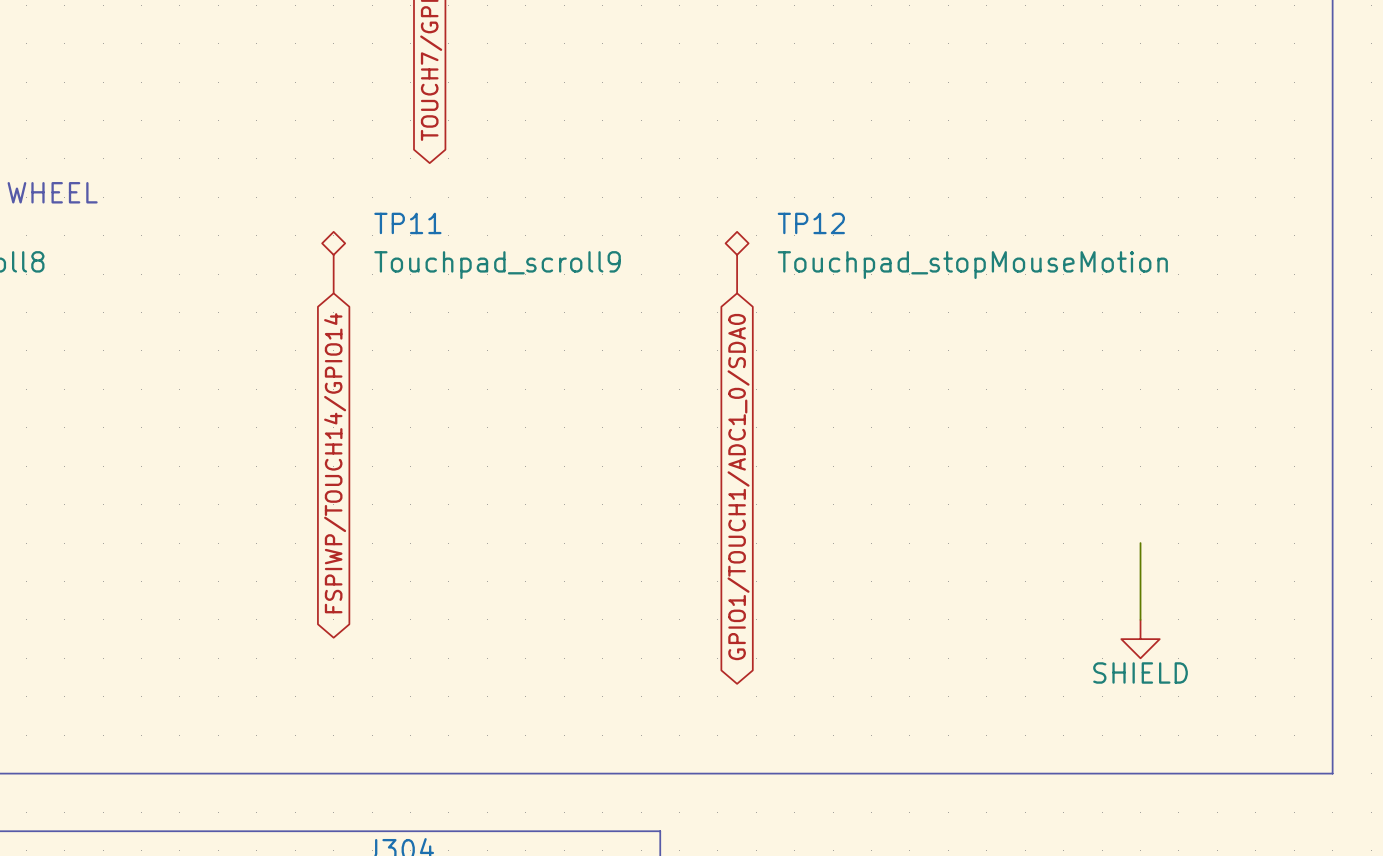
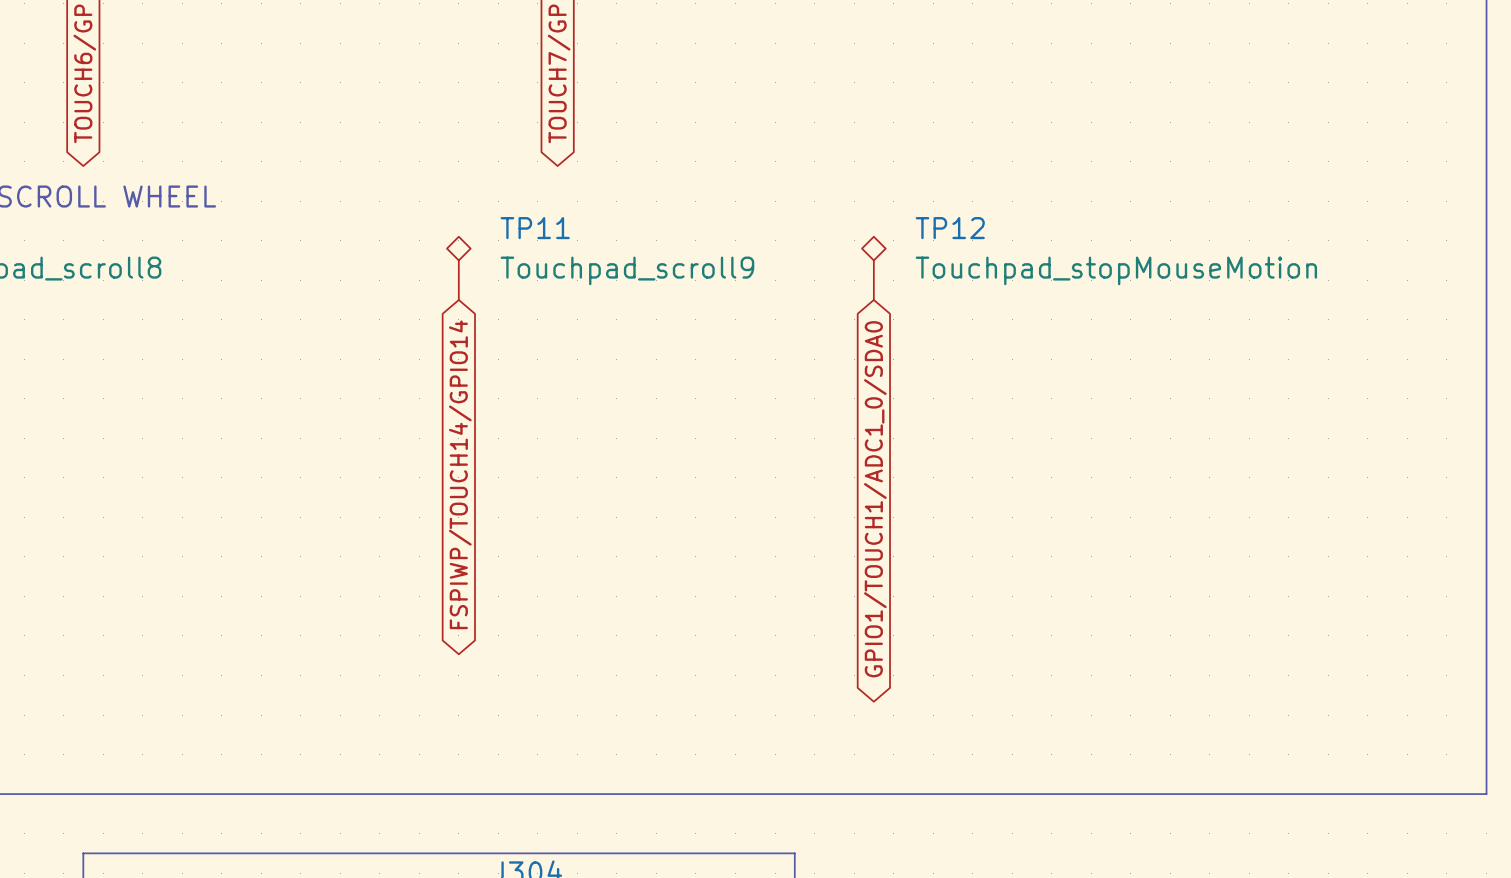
wire: (1140, 543) (1140, 619) -> none
power symbol: SHIELD (1140, 639) -> none

